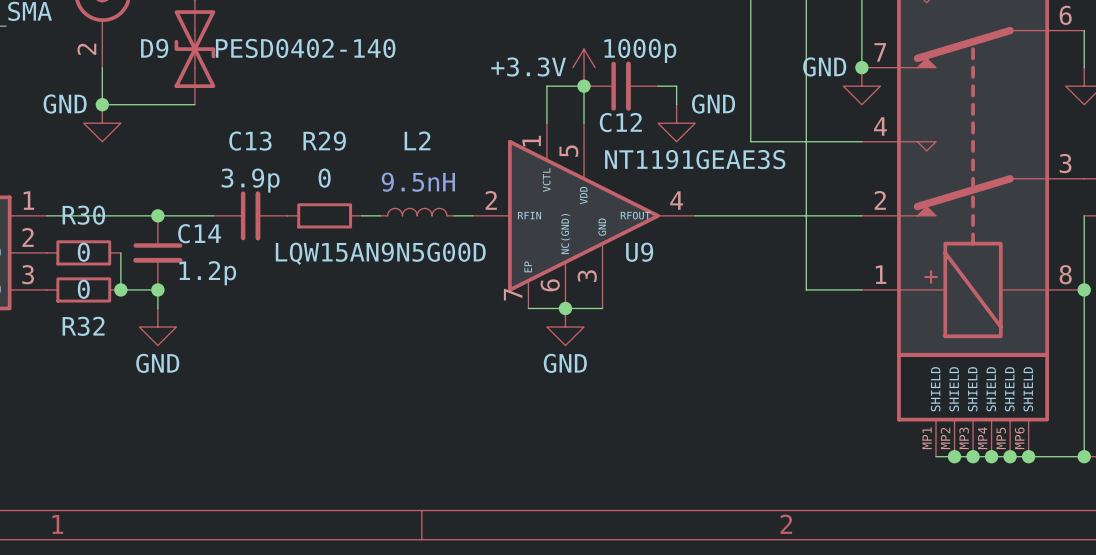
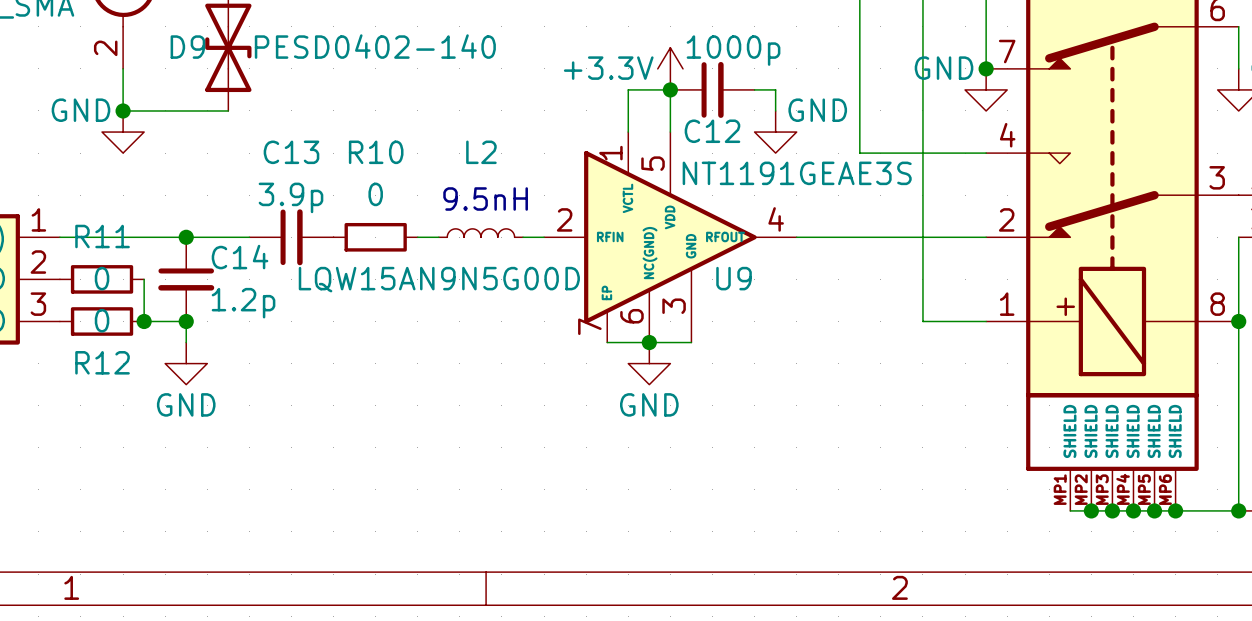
R29 name: R29 (324, 141) -> R10 (376, 152)
R30 name: R30 (83, 215) -> R11 (102, 236)
R32 name: R32 (83, 326) -> R12 (102, 362)

